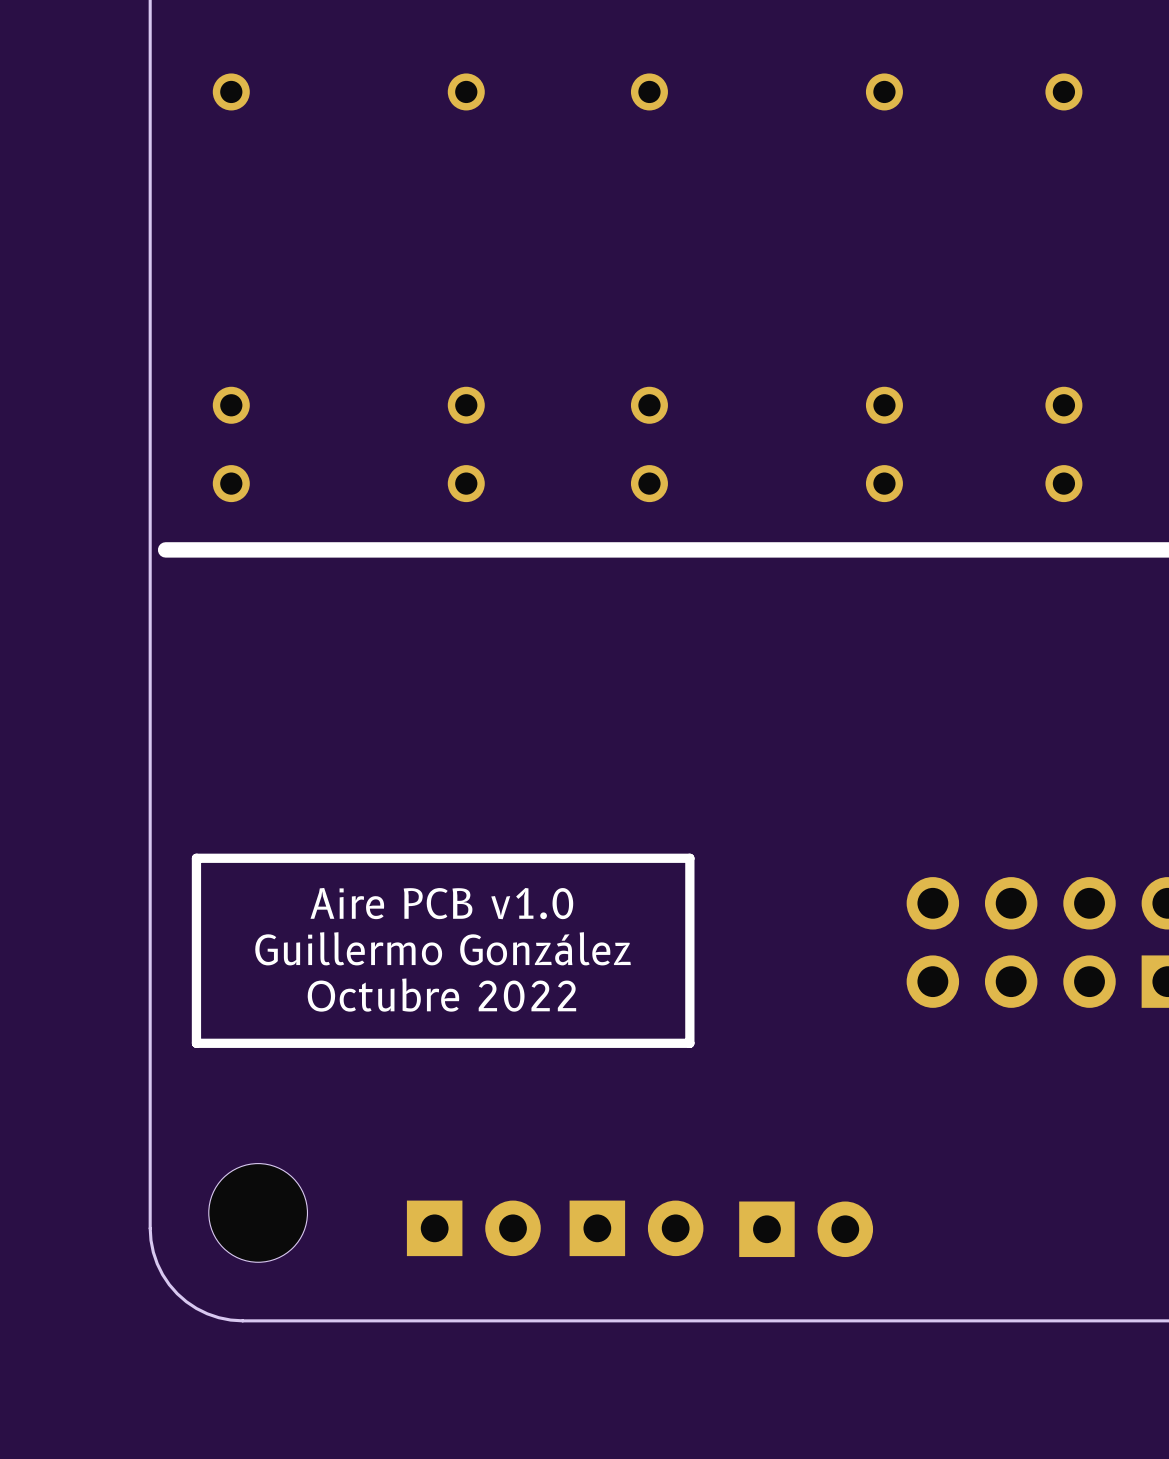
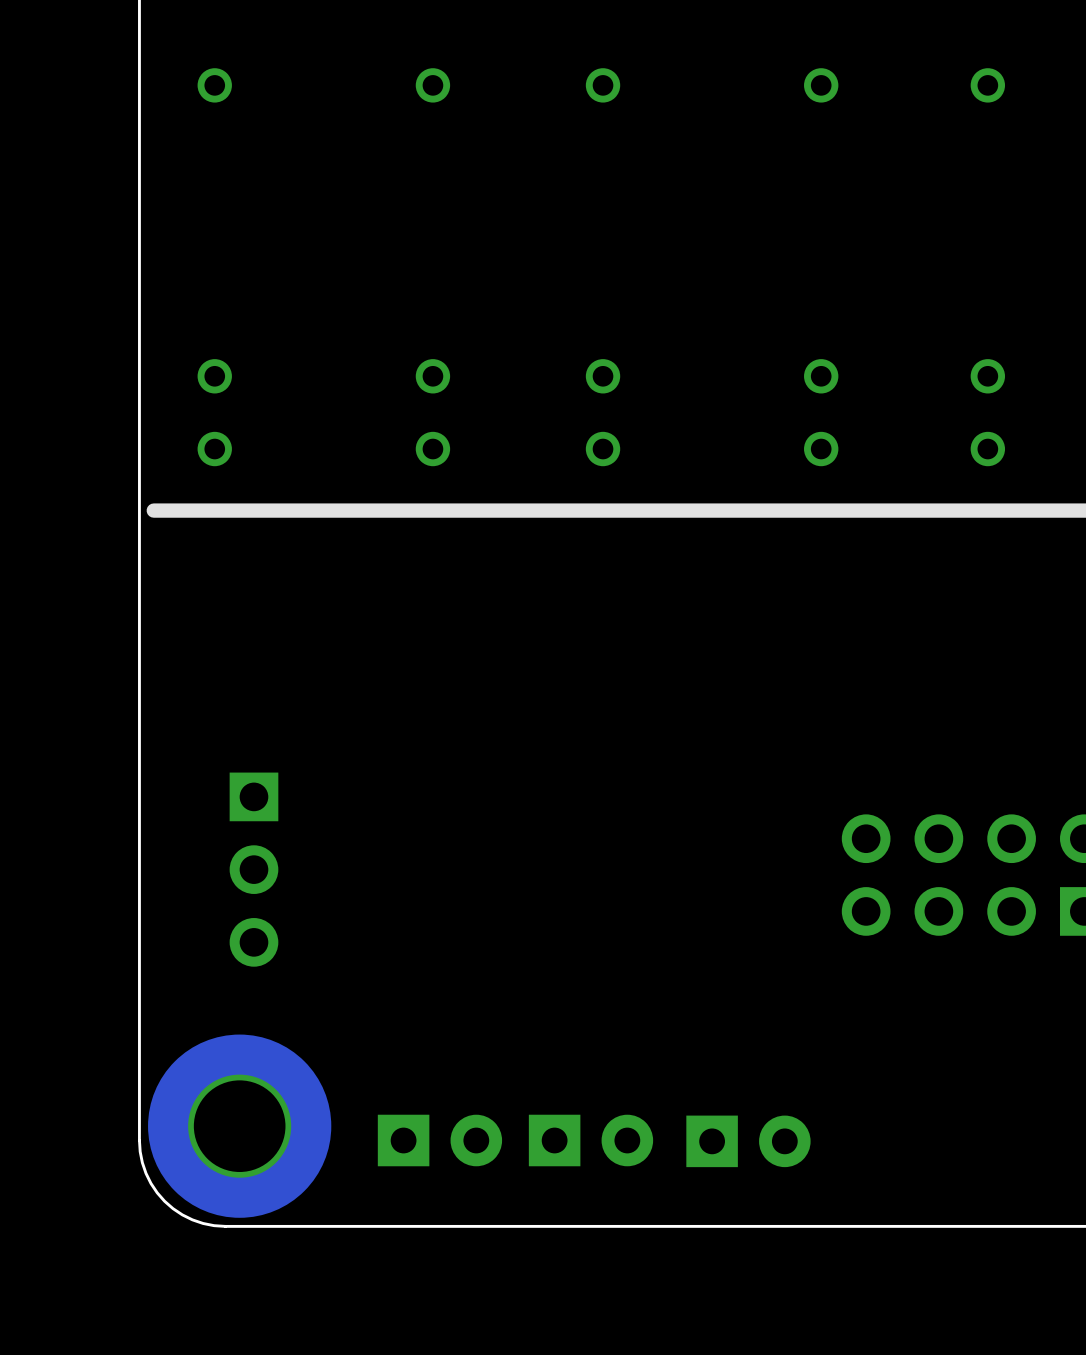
line: (689, 858) (196, 858) (196, 1043) (689, 1043) (689, 858) -> none
text: Aire PCB v1.0 (441, 903) -> none
part: none -> (253, 869)
text: Guillermo González (443, 948) -> none
text: Octubre 2022 (441, 995) -> none
part footprint: [208, 1163, 308, 1263] -> [148, 1034, 332, 1218]

